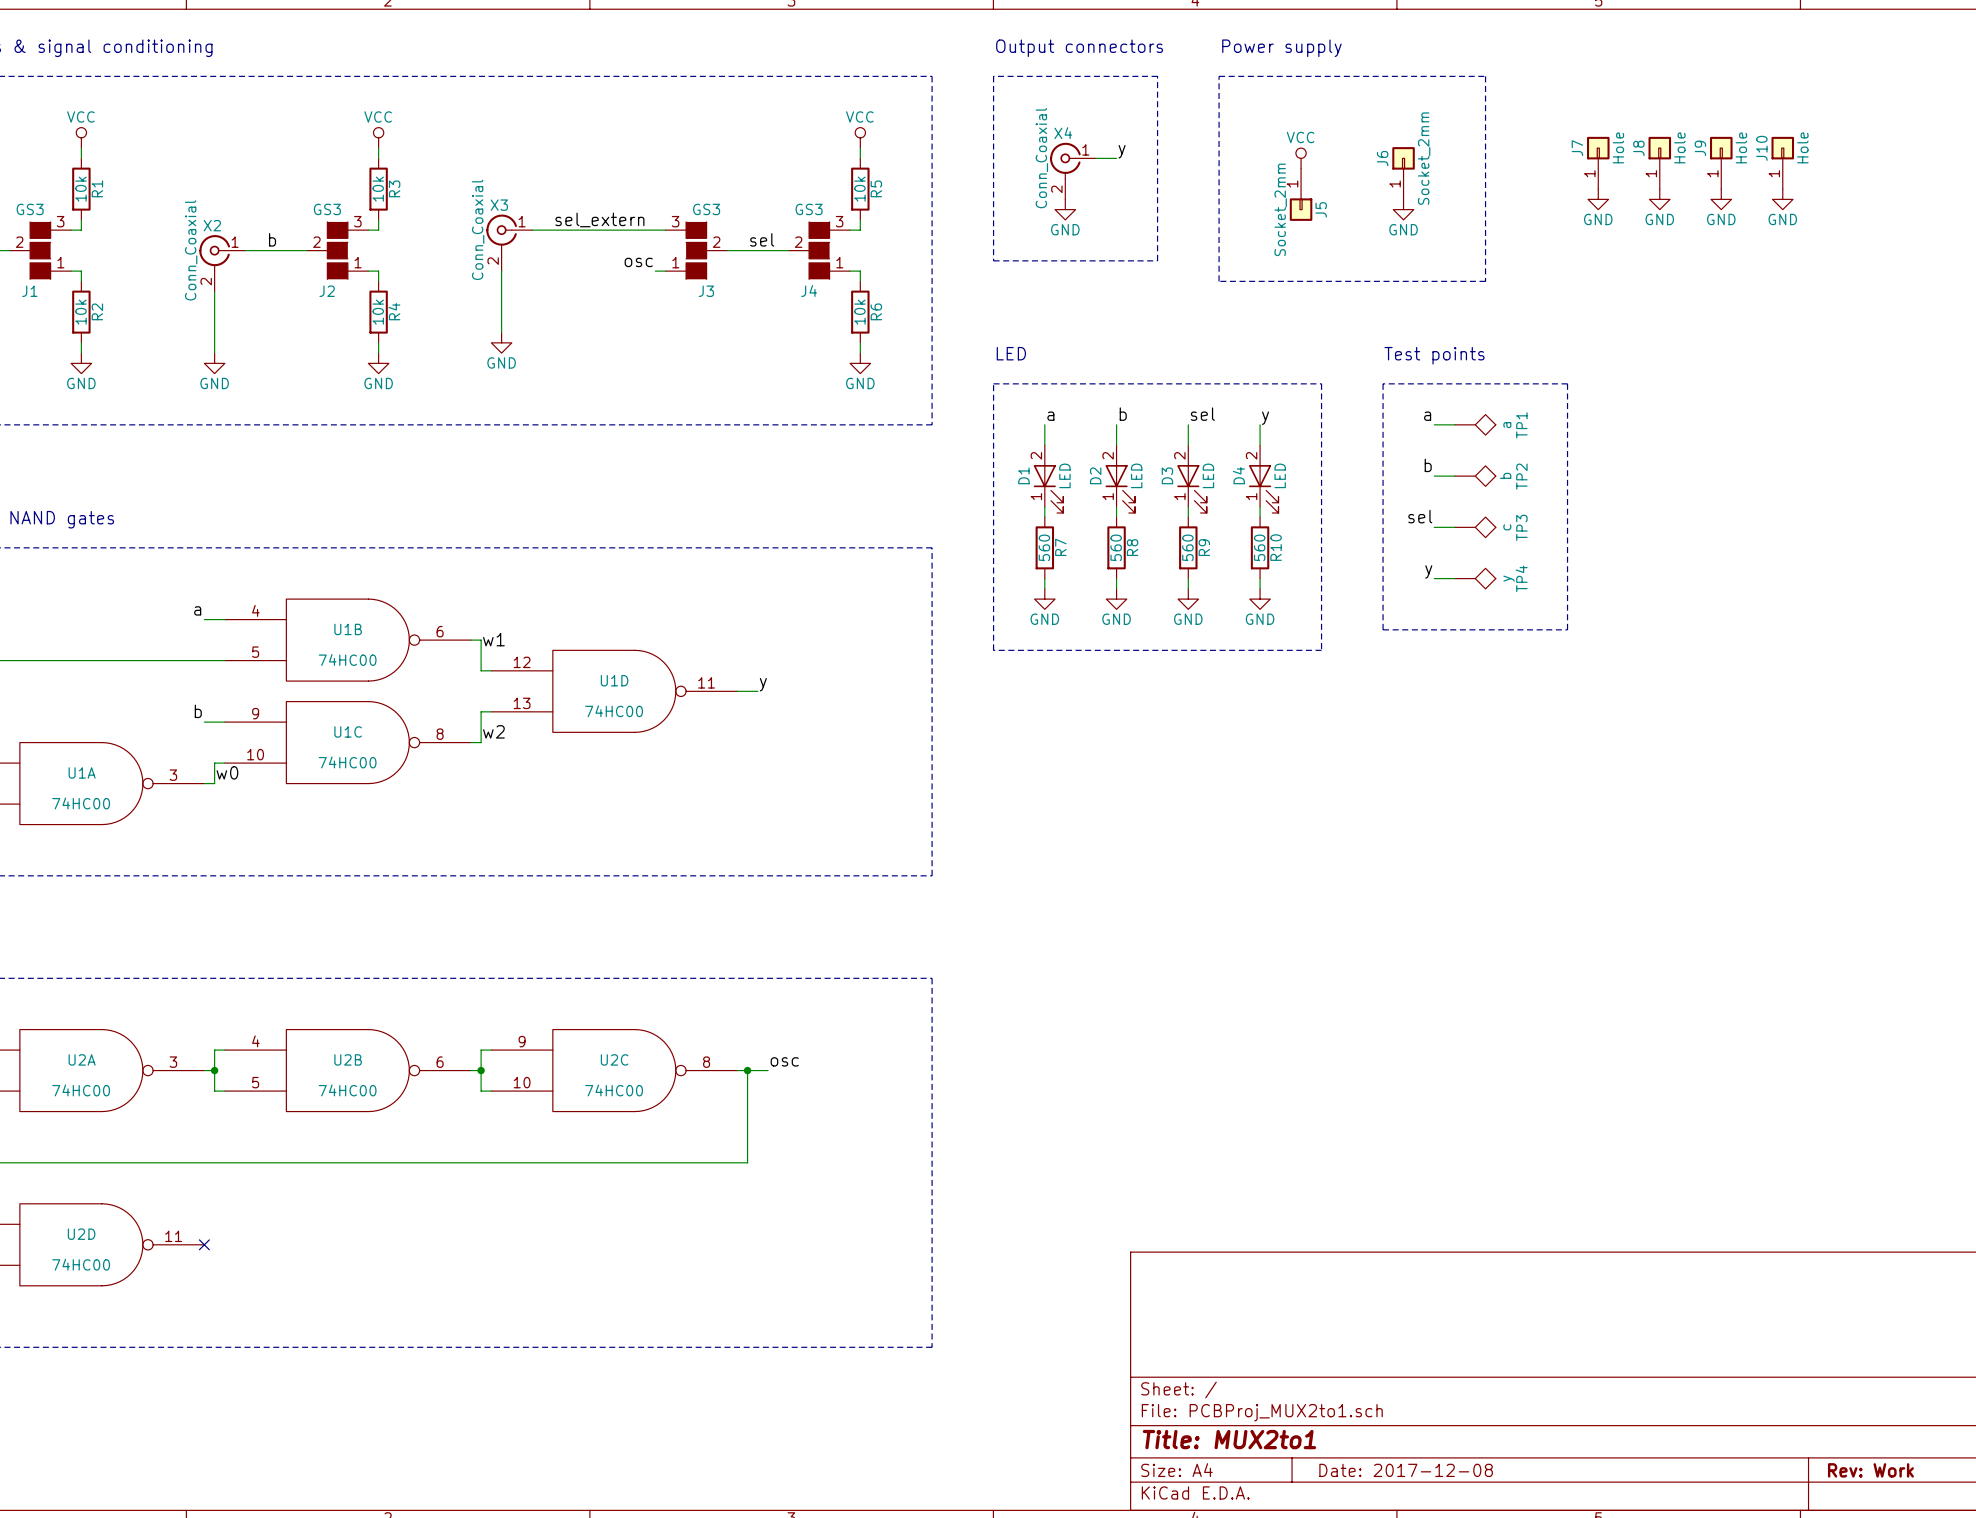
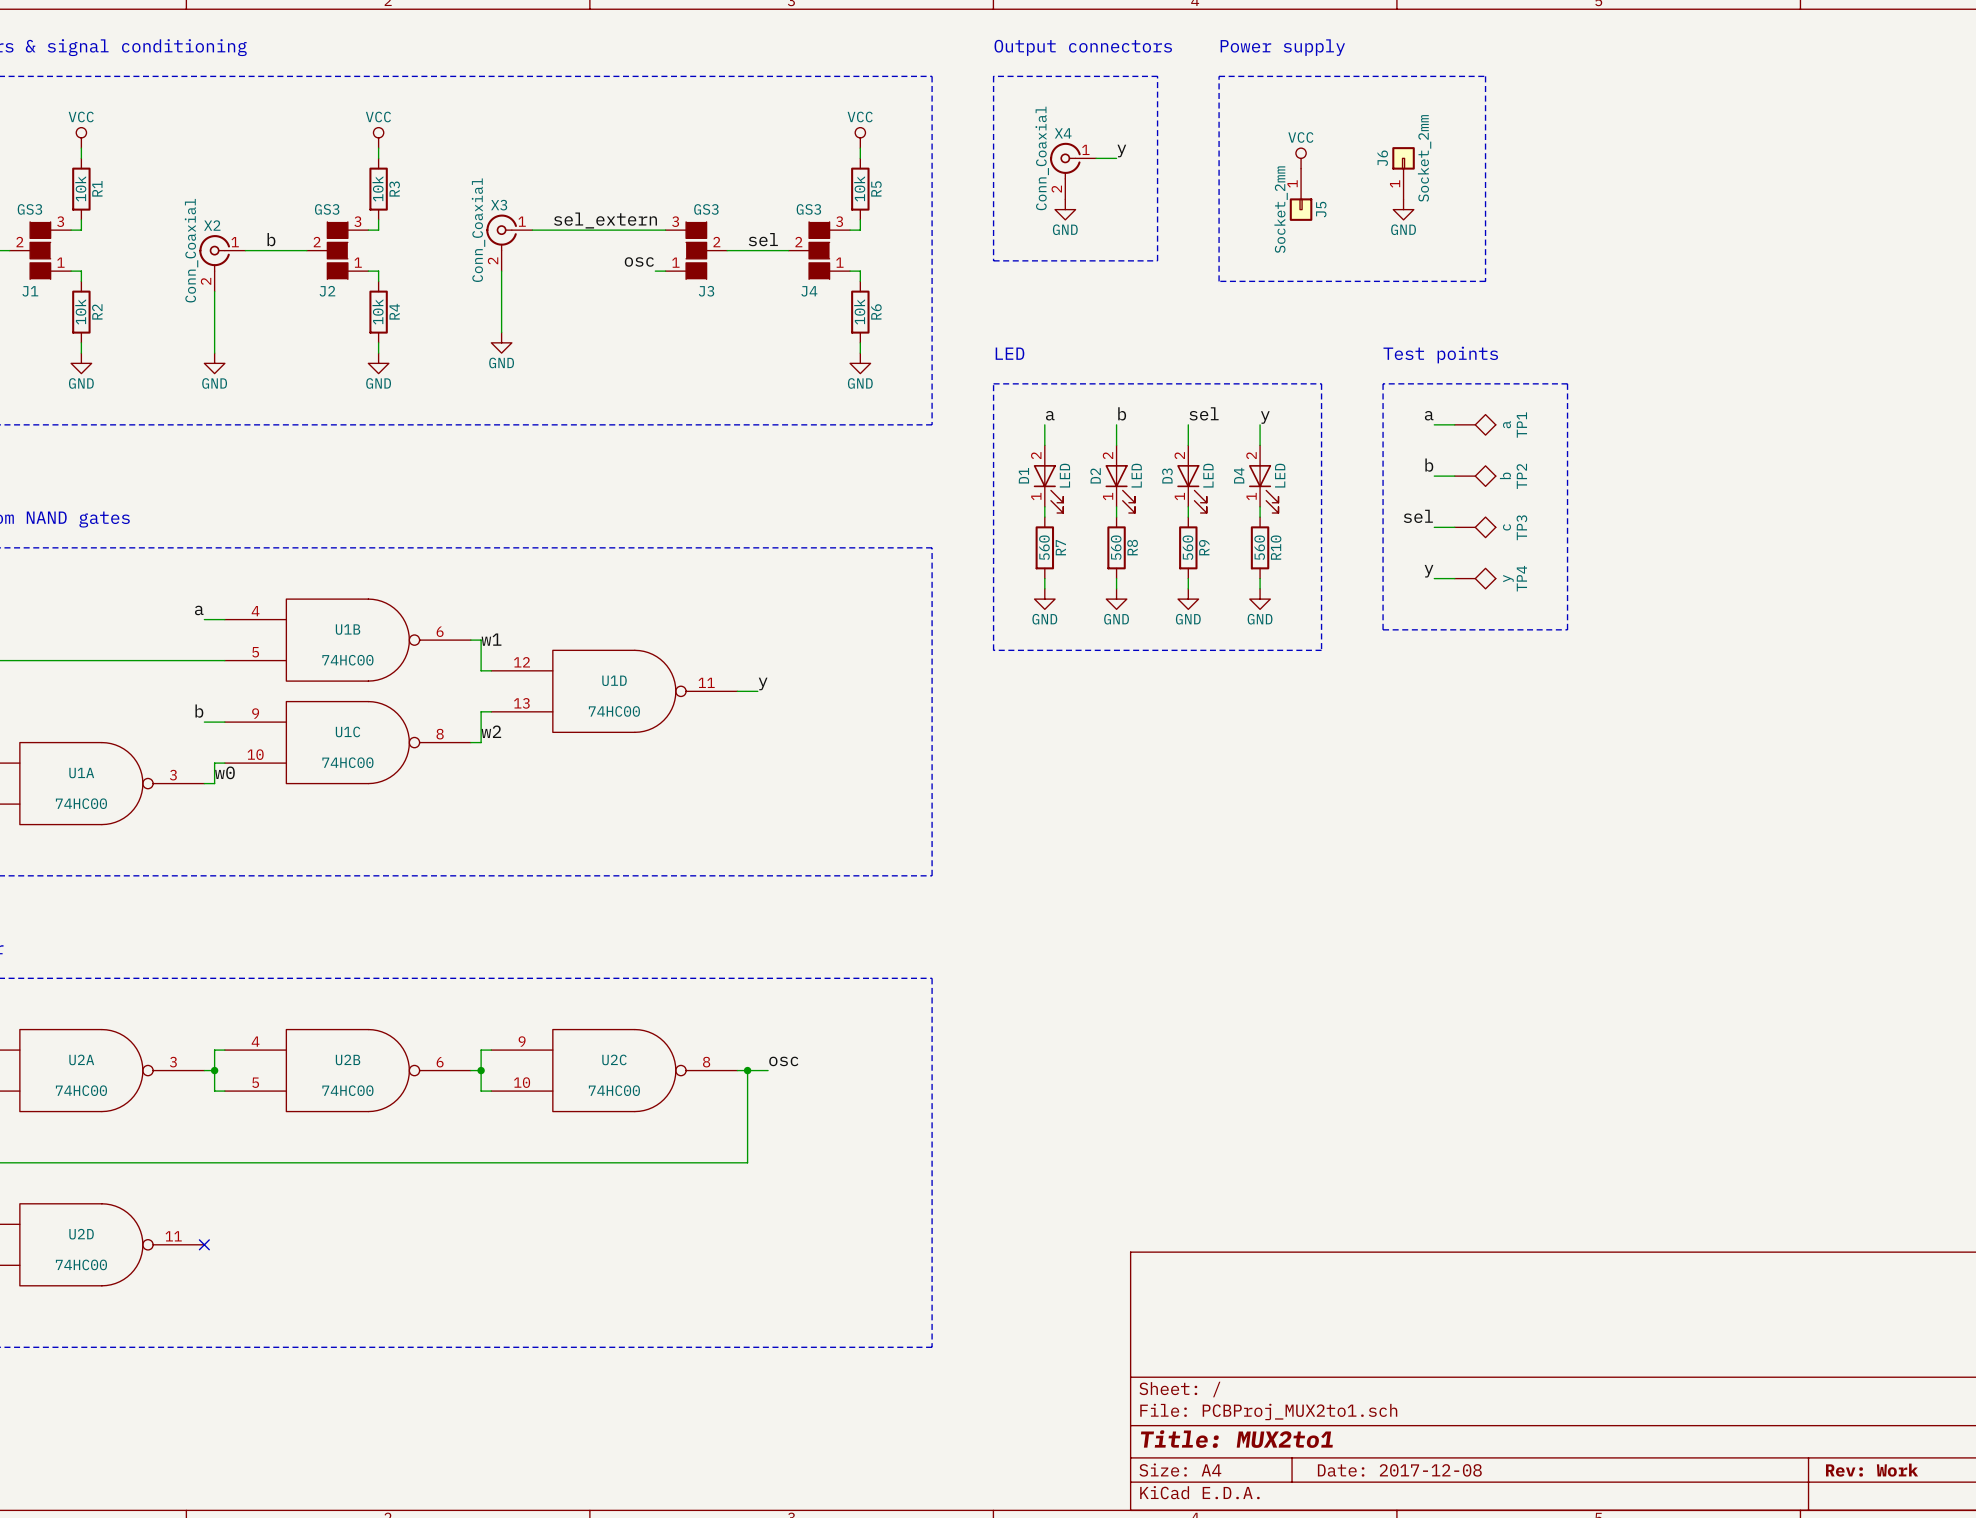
J7: Hole (1598, 162) -> none
J8: Hole (1659, 162) -> none
J9: Hole (1721, 162) -> none
J10: Hole (1782, 162) -> none
power symbol: GND (1598, 199) -> none
power symbol: GND (1659, 199) -> none
power symbol: GND (1721, 199) -> none
power symbol: GND (1782, 199) -> none

